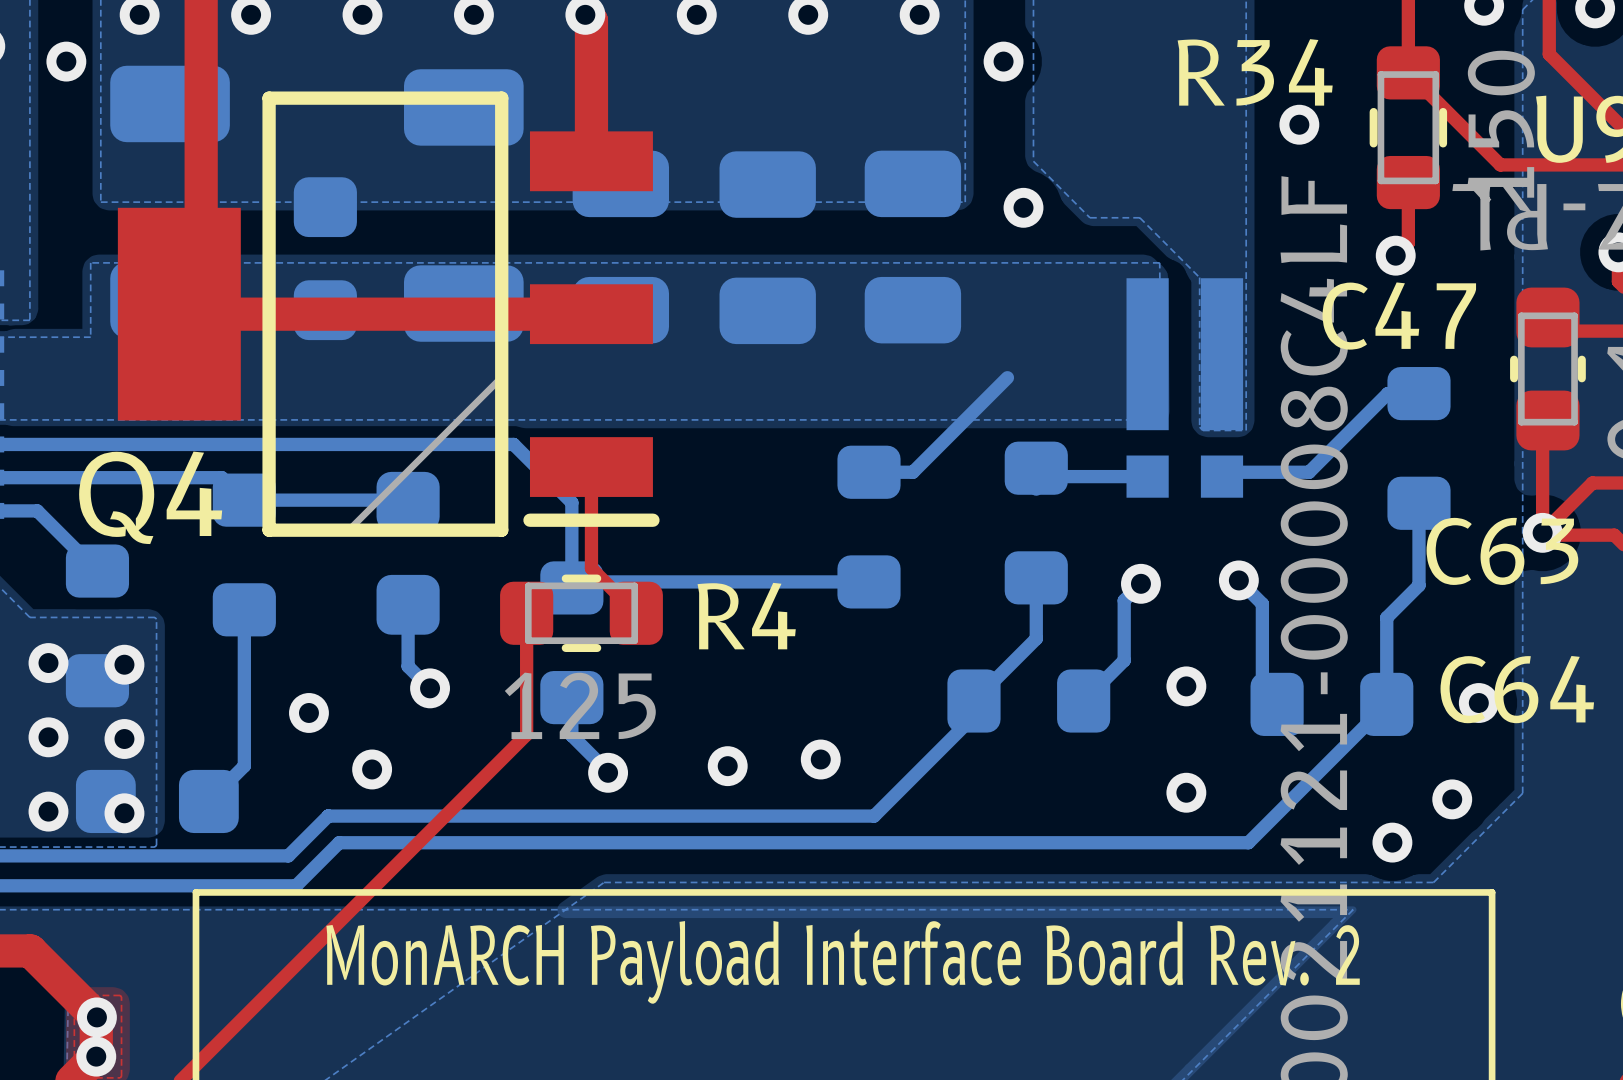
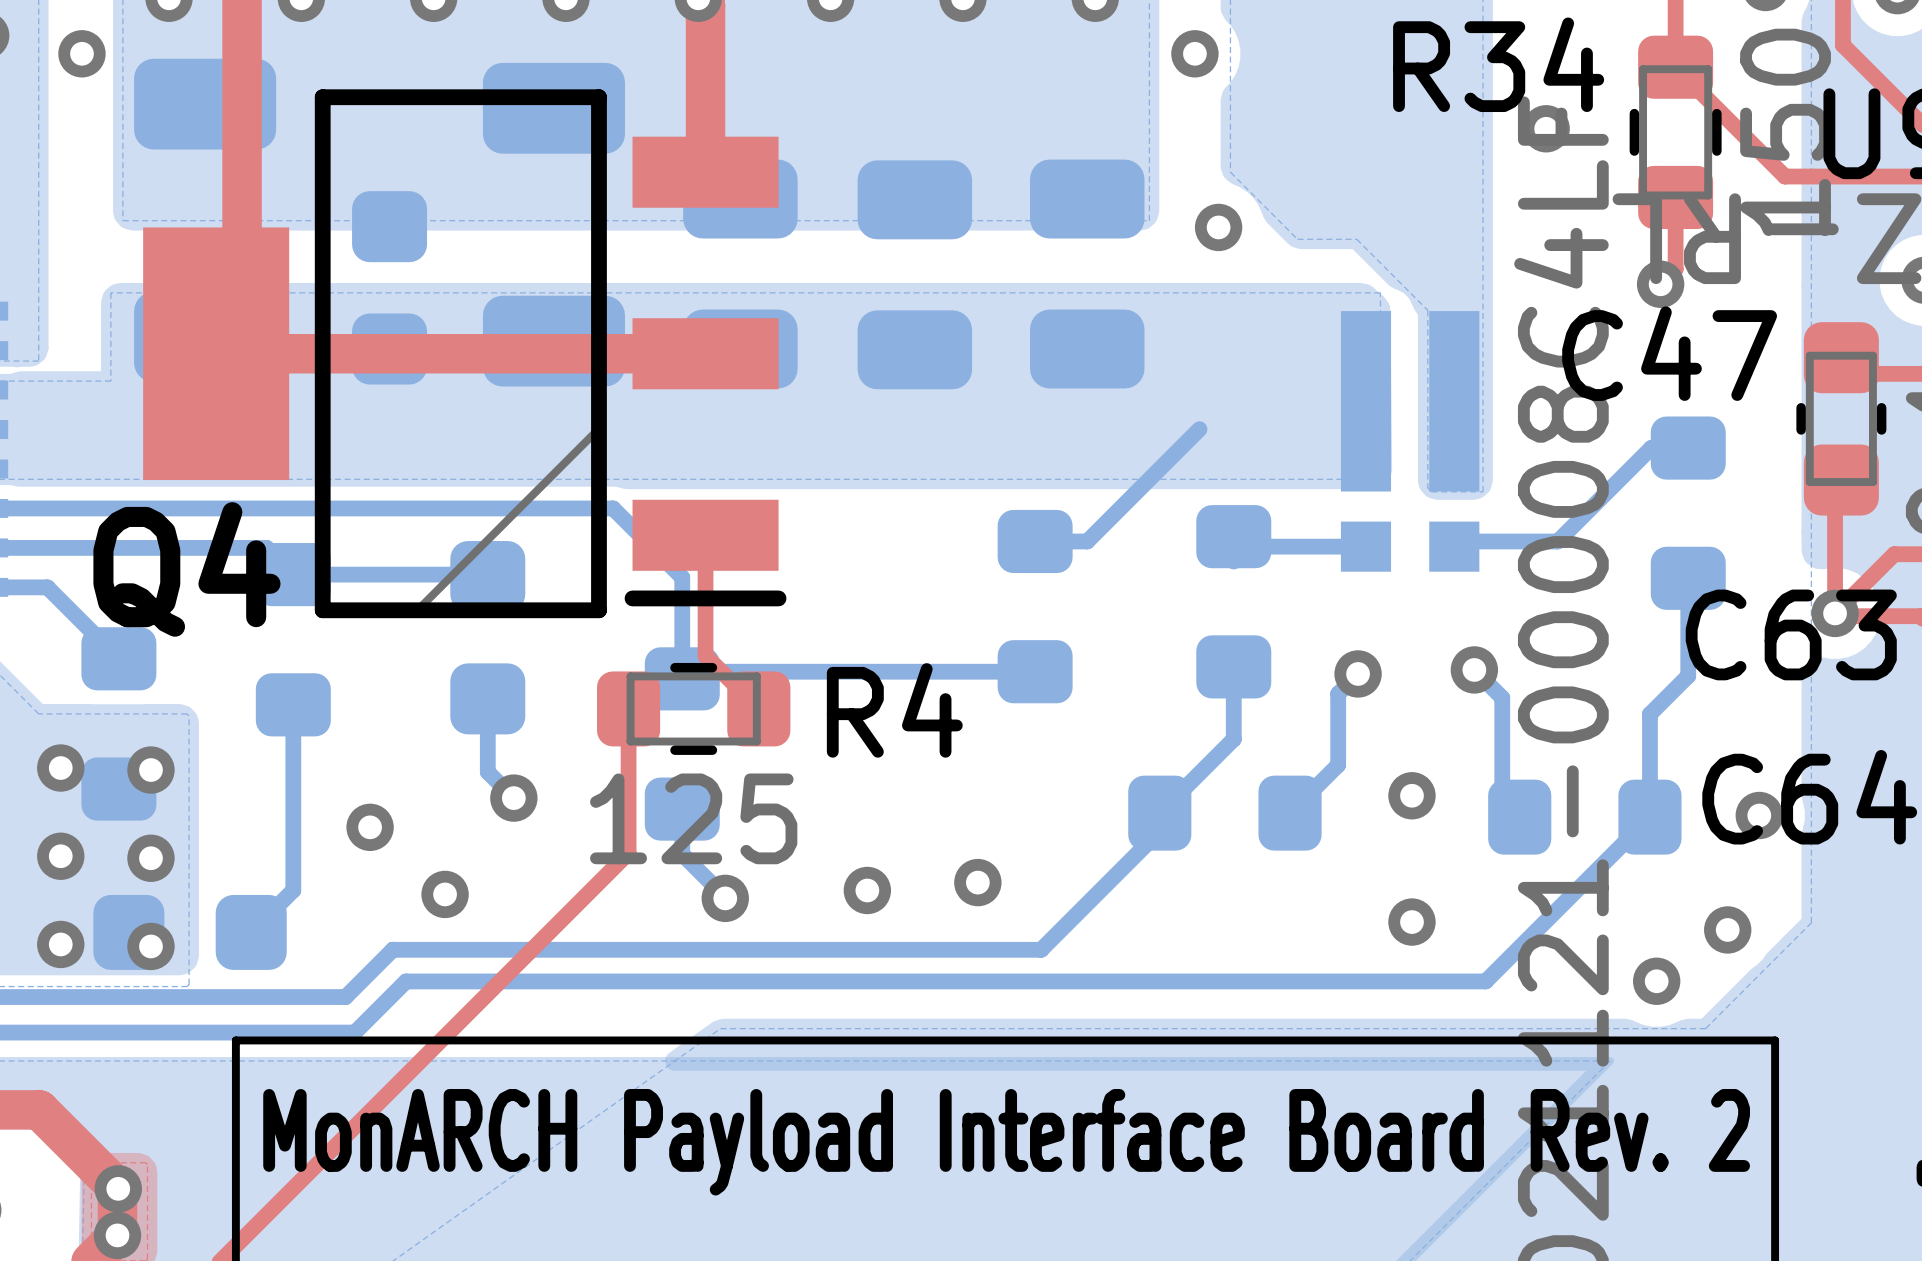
text position: MonARCH Payload Interface Board Rev. 2 (843, 962) -> MonARCH Payload Interface Board Rev. 2 (1006, 1142)

